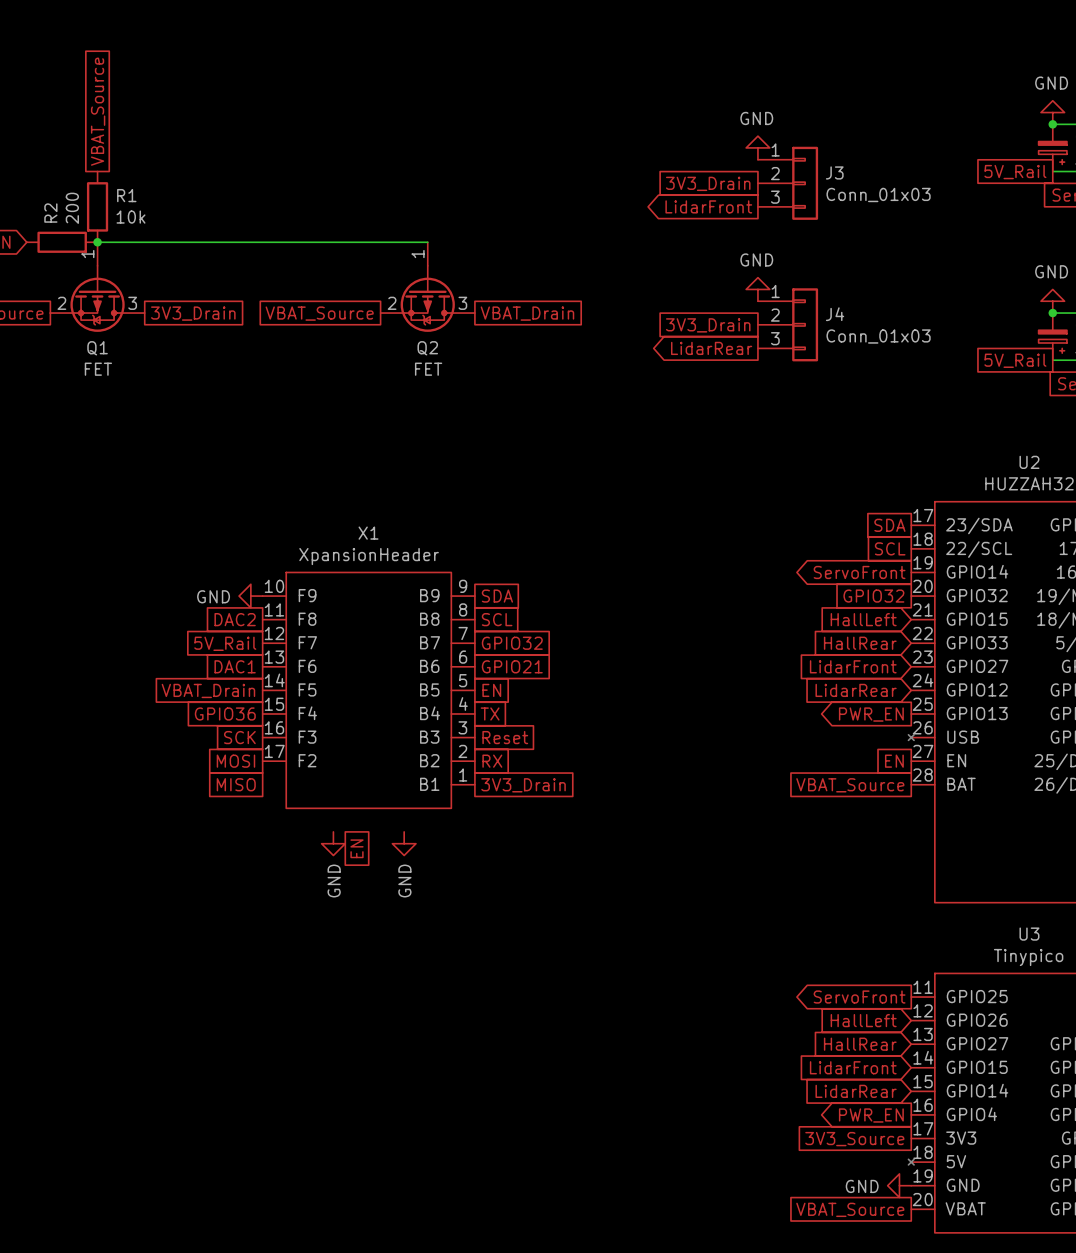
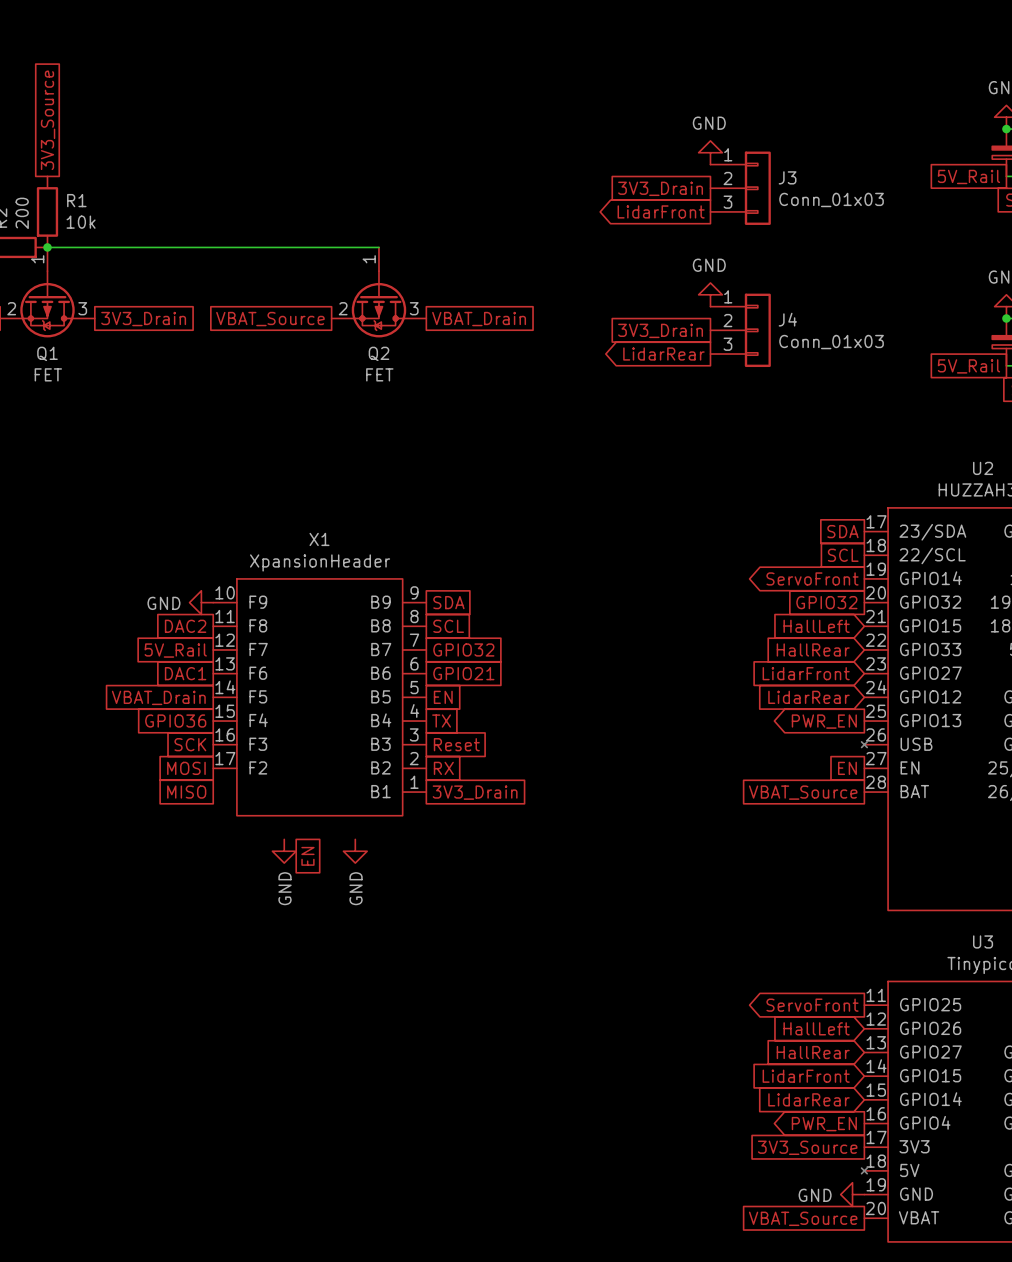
global label: VBAT_Source (98, 111) -> 3V3_Source (48, 120)

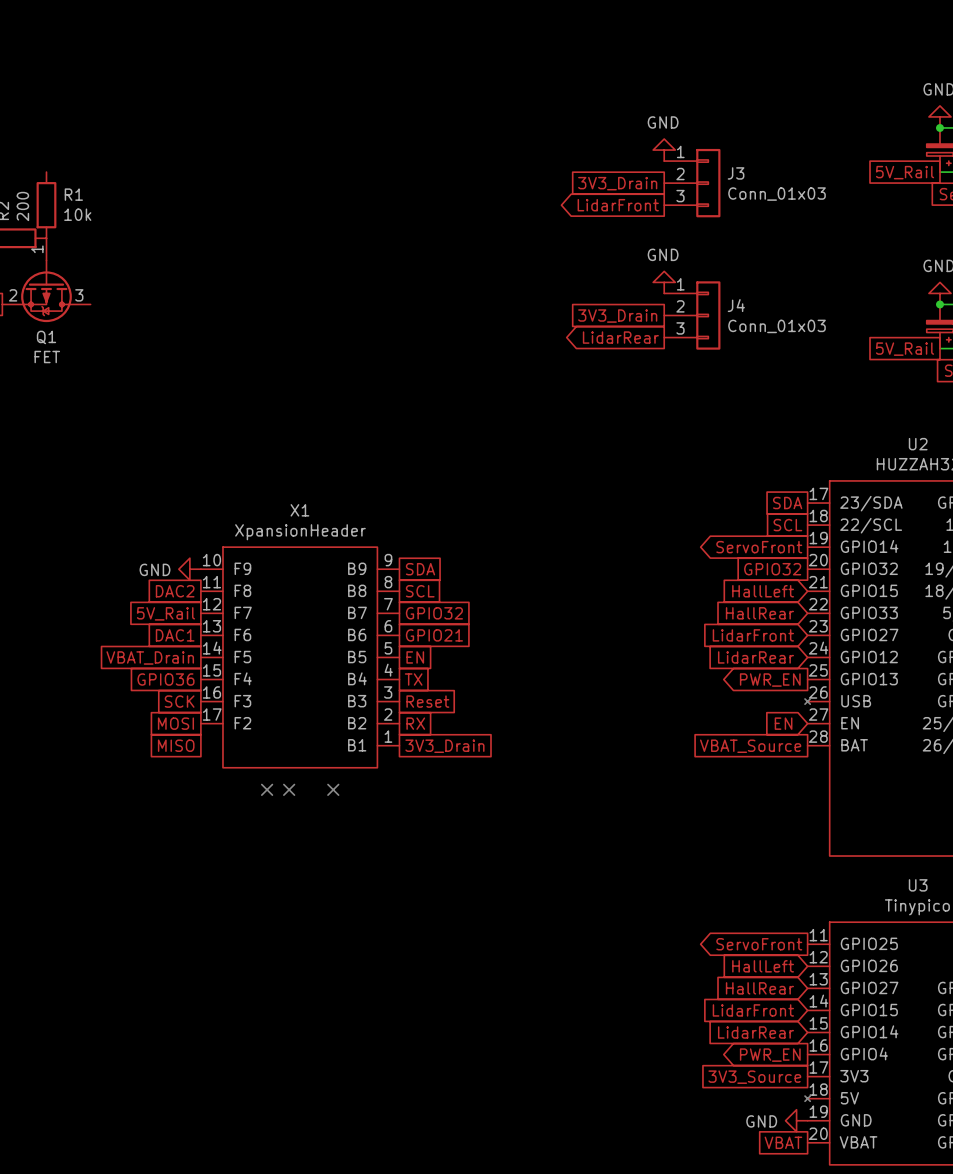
global label: 3V3_Source (48, 120) -> none
wire: (47, 247) (378, 247) -> none
junction: (47, 247) -> none
Q2: FET (378, 292) -> none
global label: 3V3_Drain (143, 319) -> none
global label: VBAT_Source (270, 319) -> none
global label: VBAT_Drain (479, 319) -> none
global label shape: passive (847, 768) -> input (783, 723)
no-connect mark: none -> (267, 789)
no-connect mark: none -> (289, 789)
no-connect mark: none -> (333, 789)
power symbol: GND (284, 851) -> none
power symbol: GND (355, 851) -> none
global label: EN (307, 856) -> none
global label: VBAT_Source (803, 1218) -> VBAT (783, 1142)

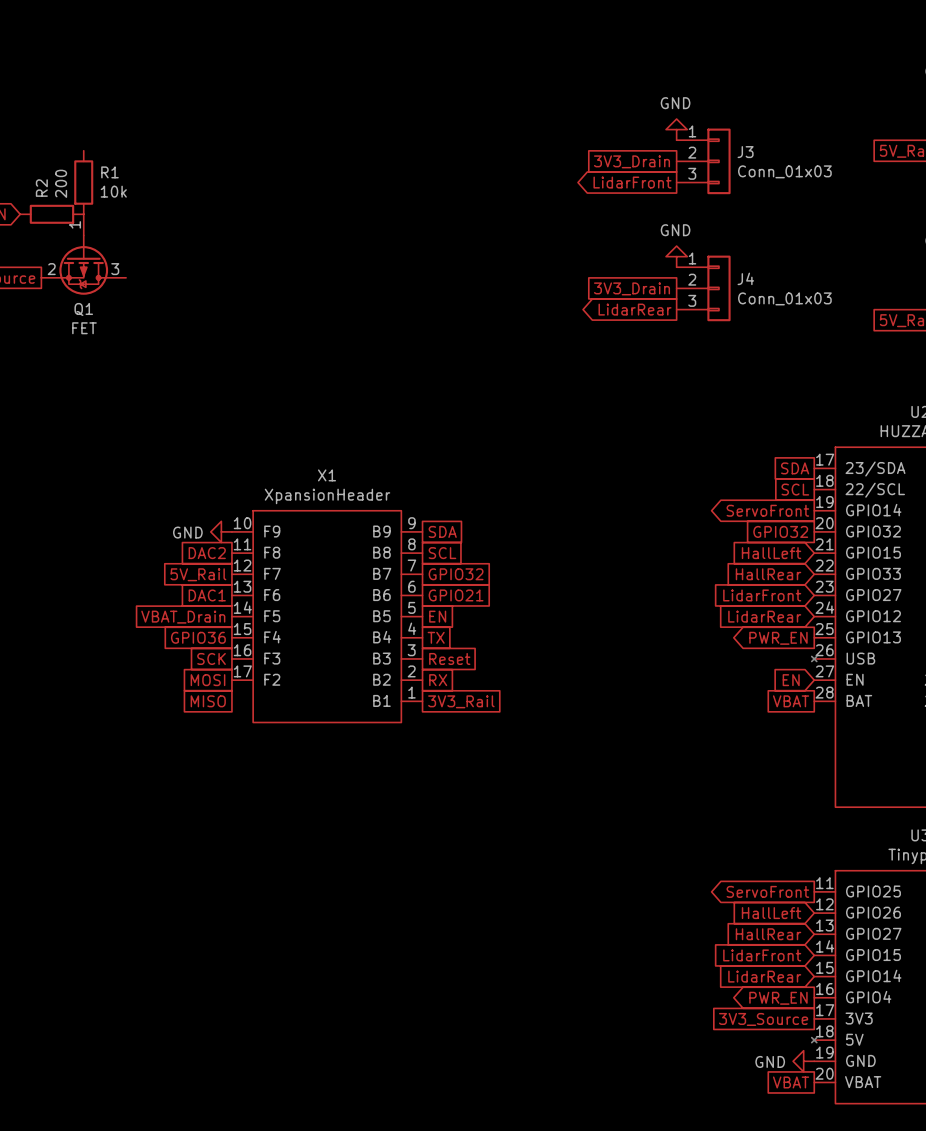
global label: 3V3_Drain (444, 746) -> 3V3_Rail (461, 701)
global label: VBAT_Source (750, 746) -> VBAT (791, 701)
no-connect mark: (267, 789) -> none
no-connect mark: (289, 789) -> none
no-connect mark: (333, 789) -> none

